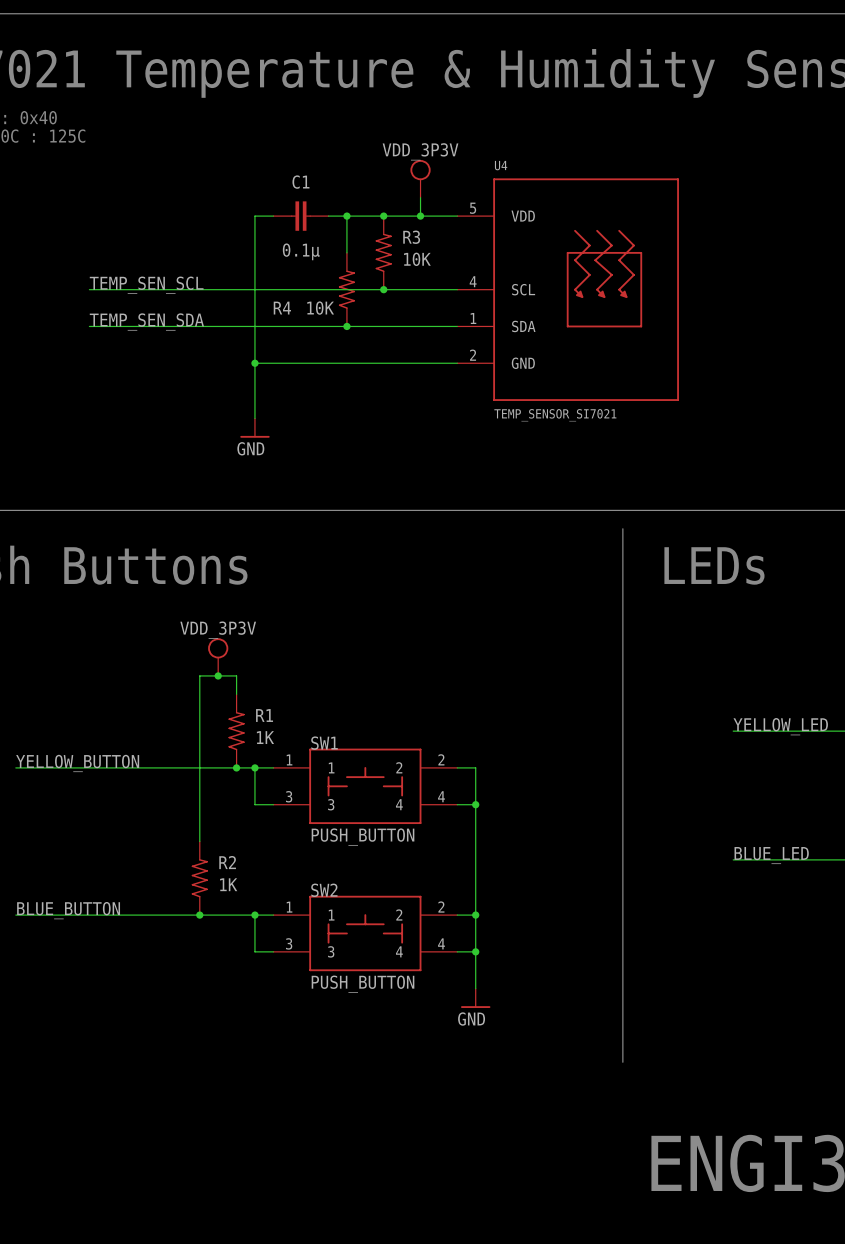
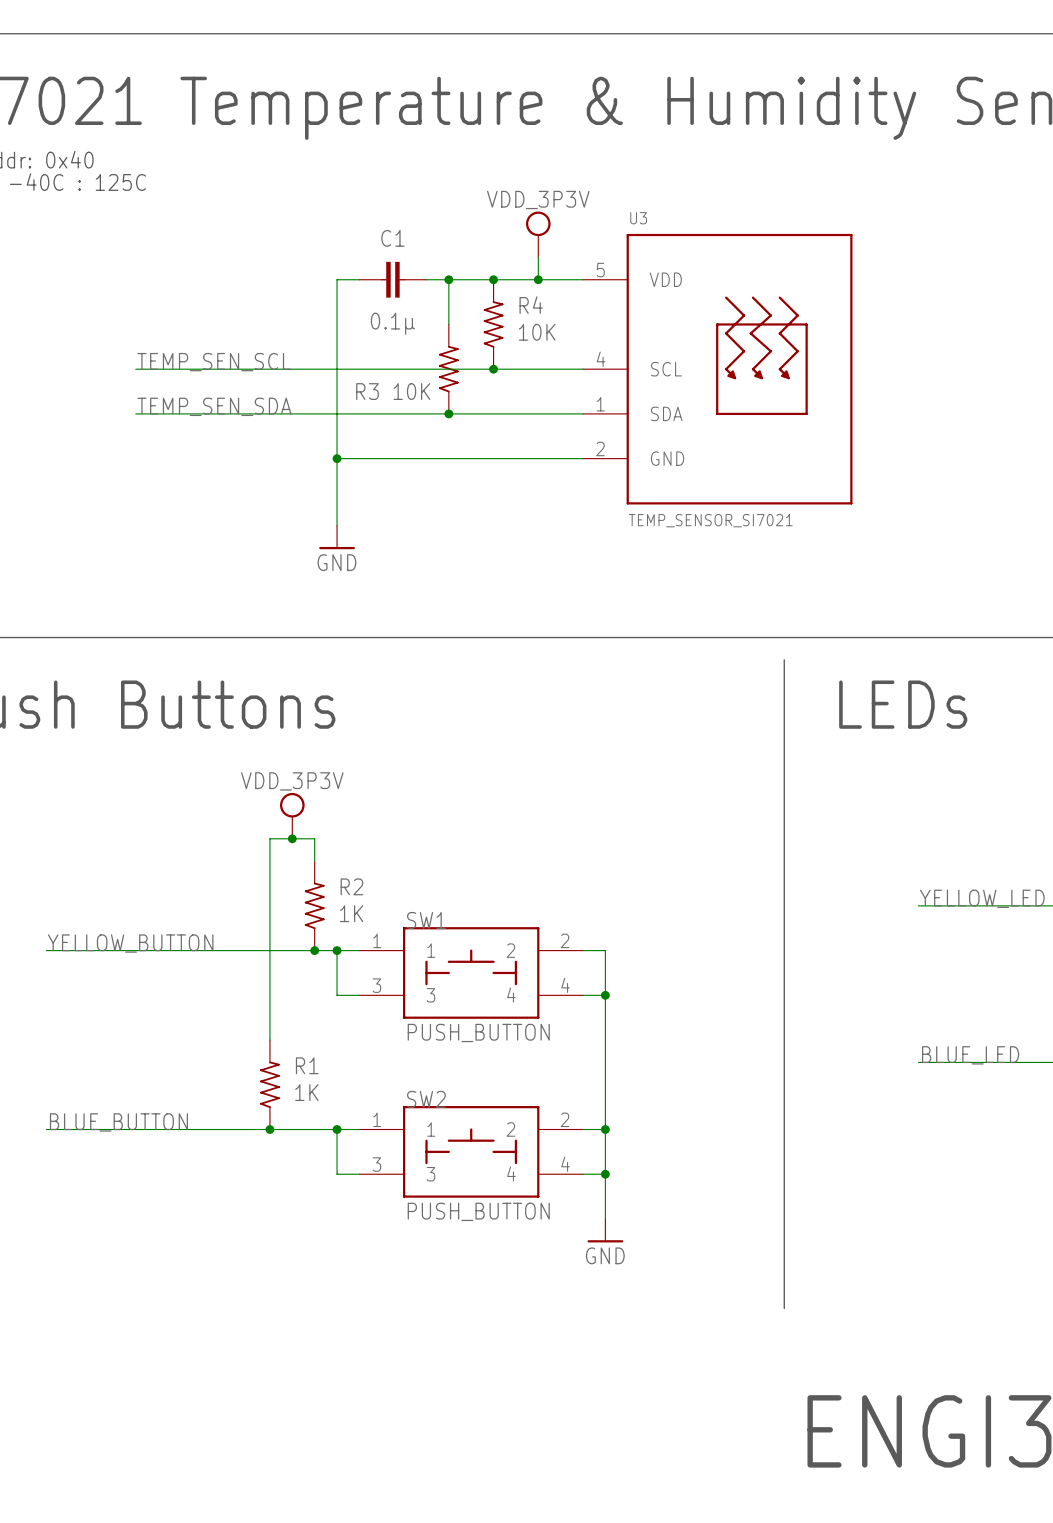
U4 name: U4 (501, 165) -> U3 (638, 218)
R3 name: R3 (411, 237) -> R4 (531, 305)
R4 name: R4 (282, 308) -> R3 (367, 391)
R1 name: R1 (264, 715) -> R2 (351, 886)
R2 name: R2 (227, 862) -> R1 (307, 1065)

